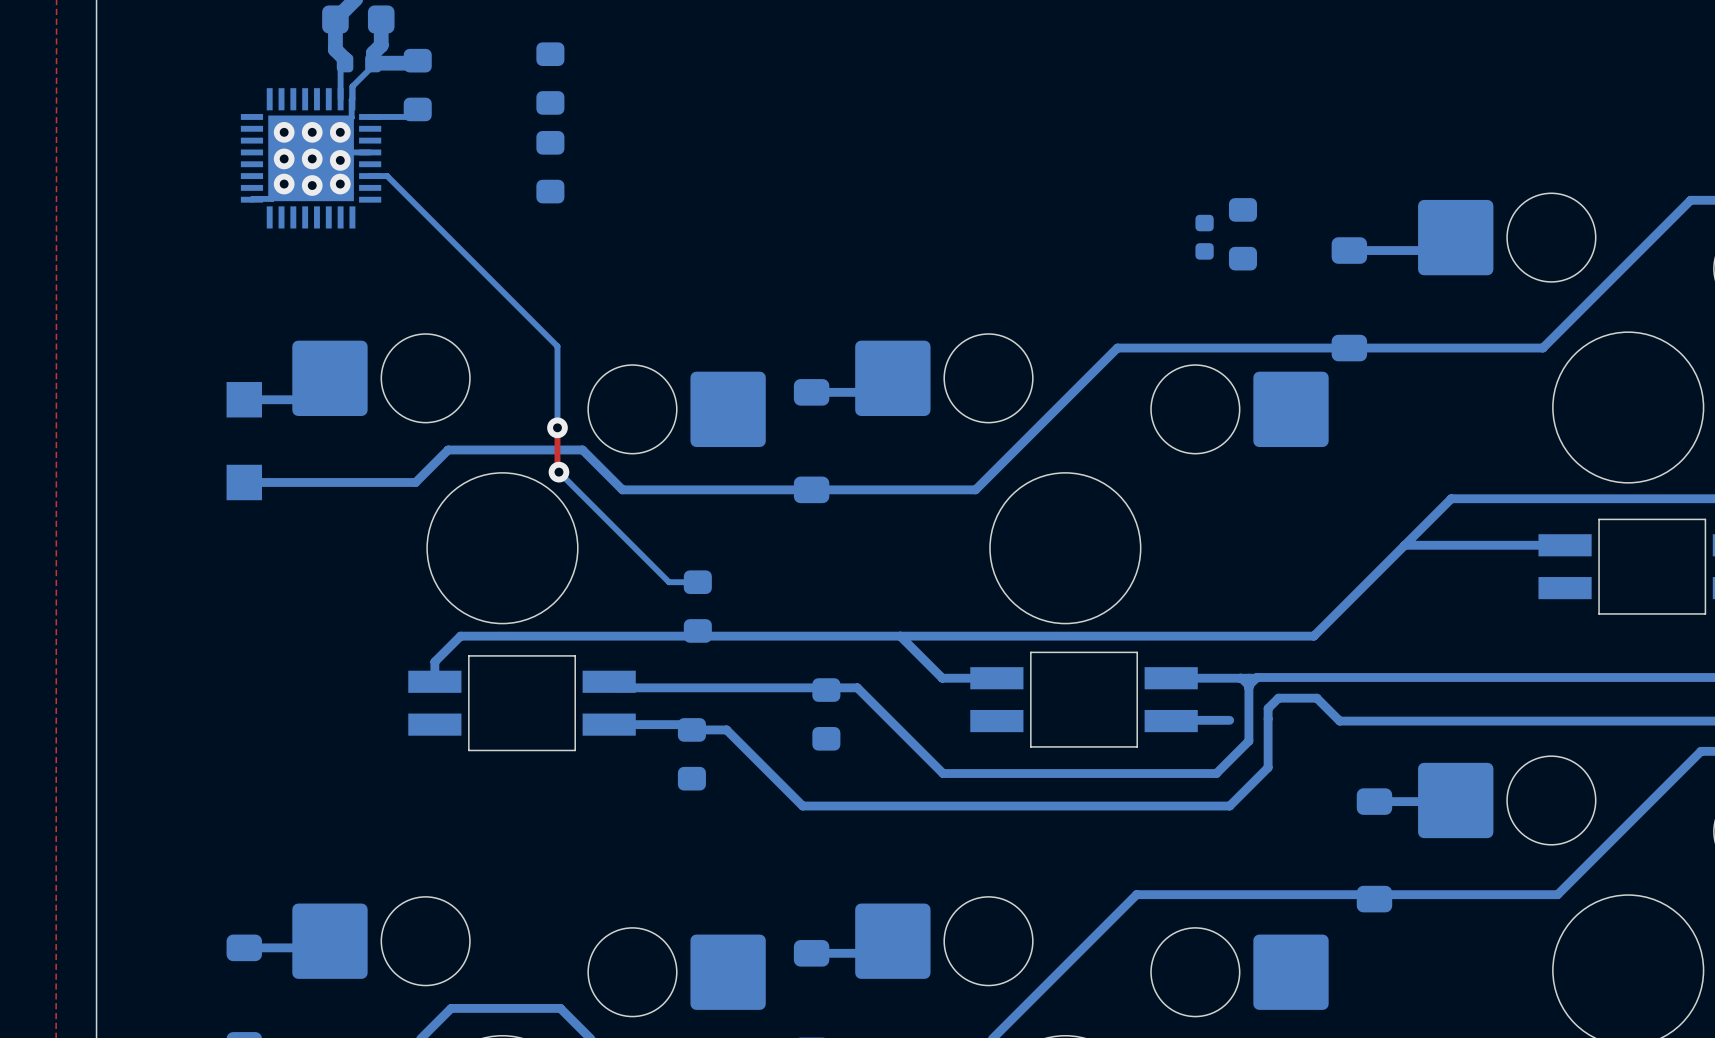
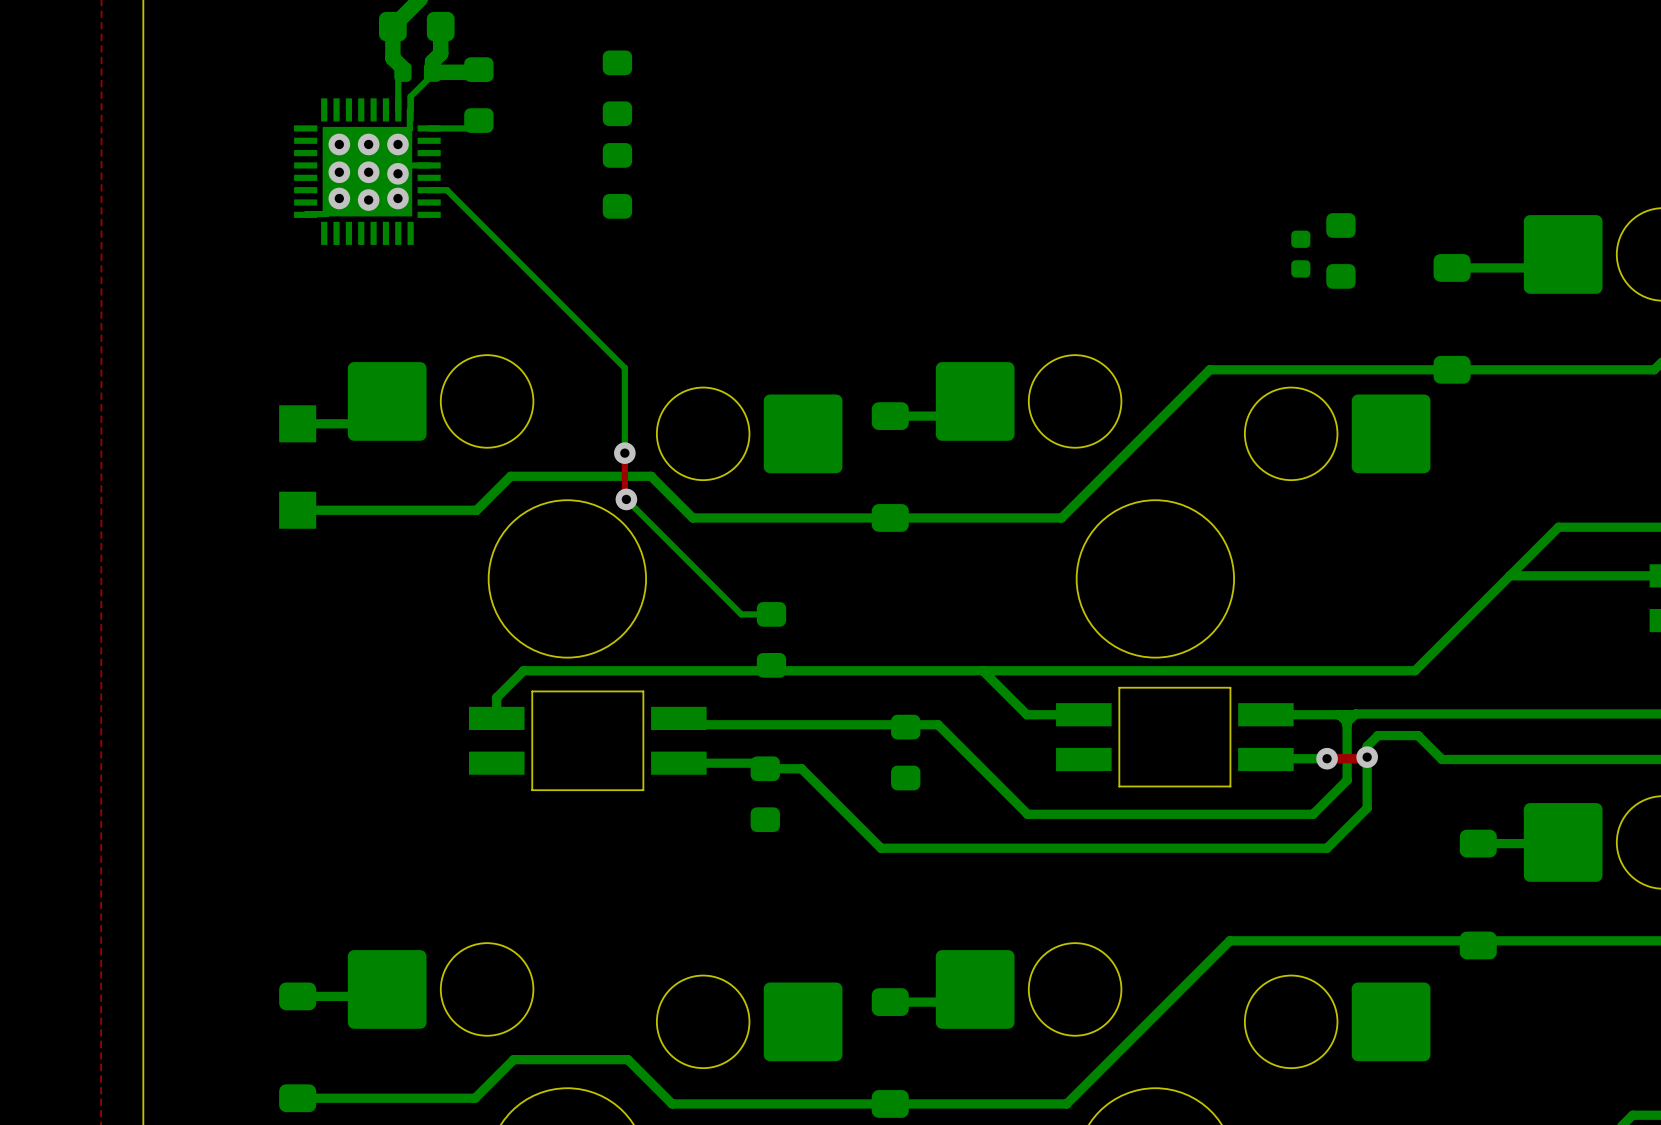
top track: none -> (1367, 757) (1327, 758)
via: none -> (1367, 757)
via: none -> (1327, 758)

